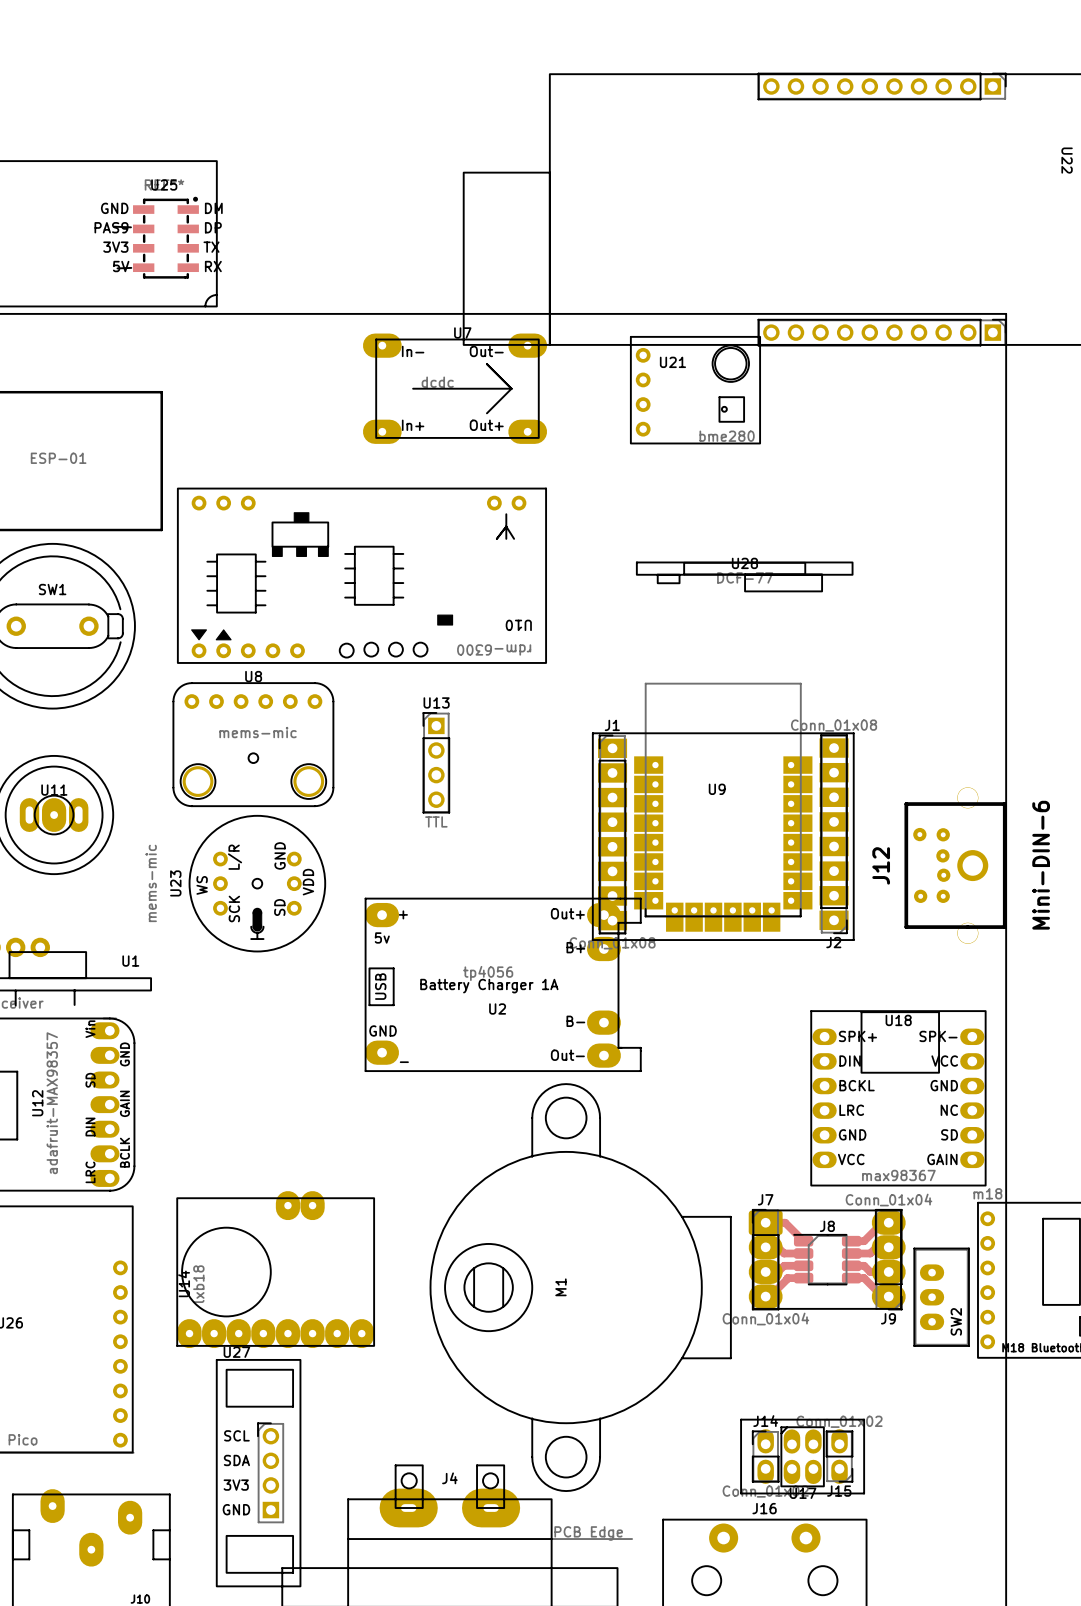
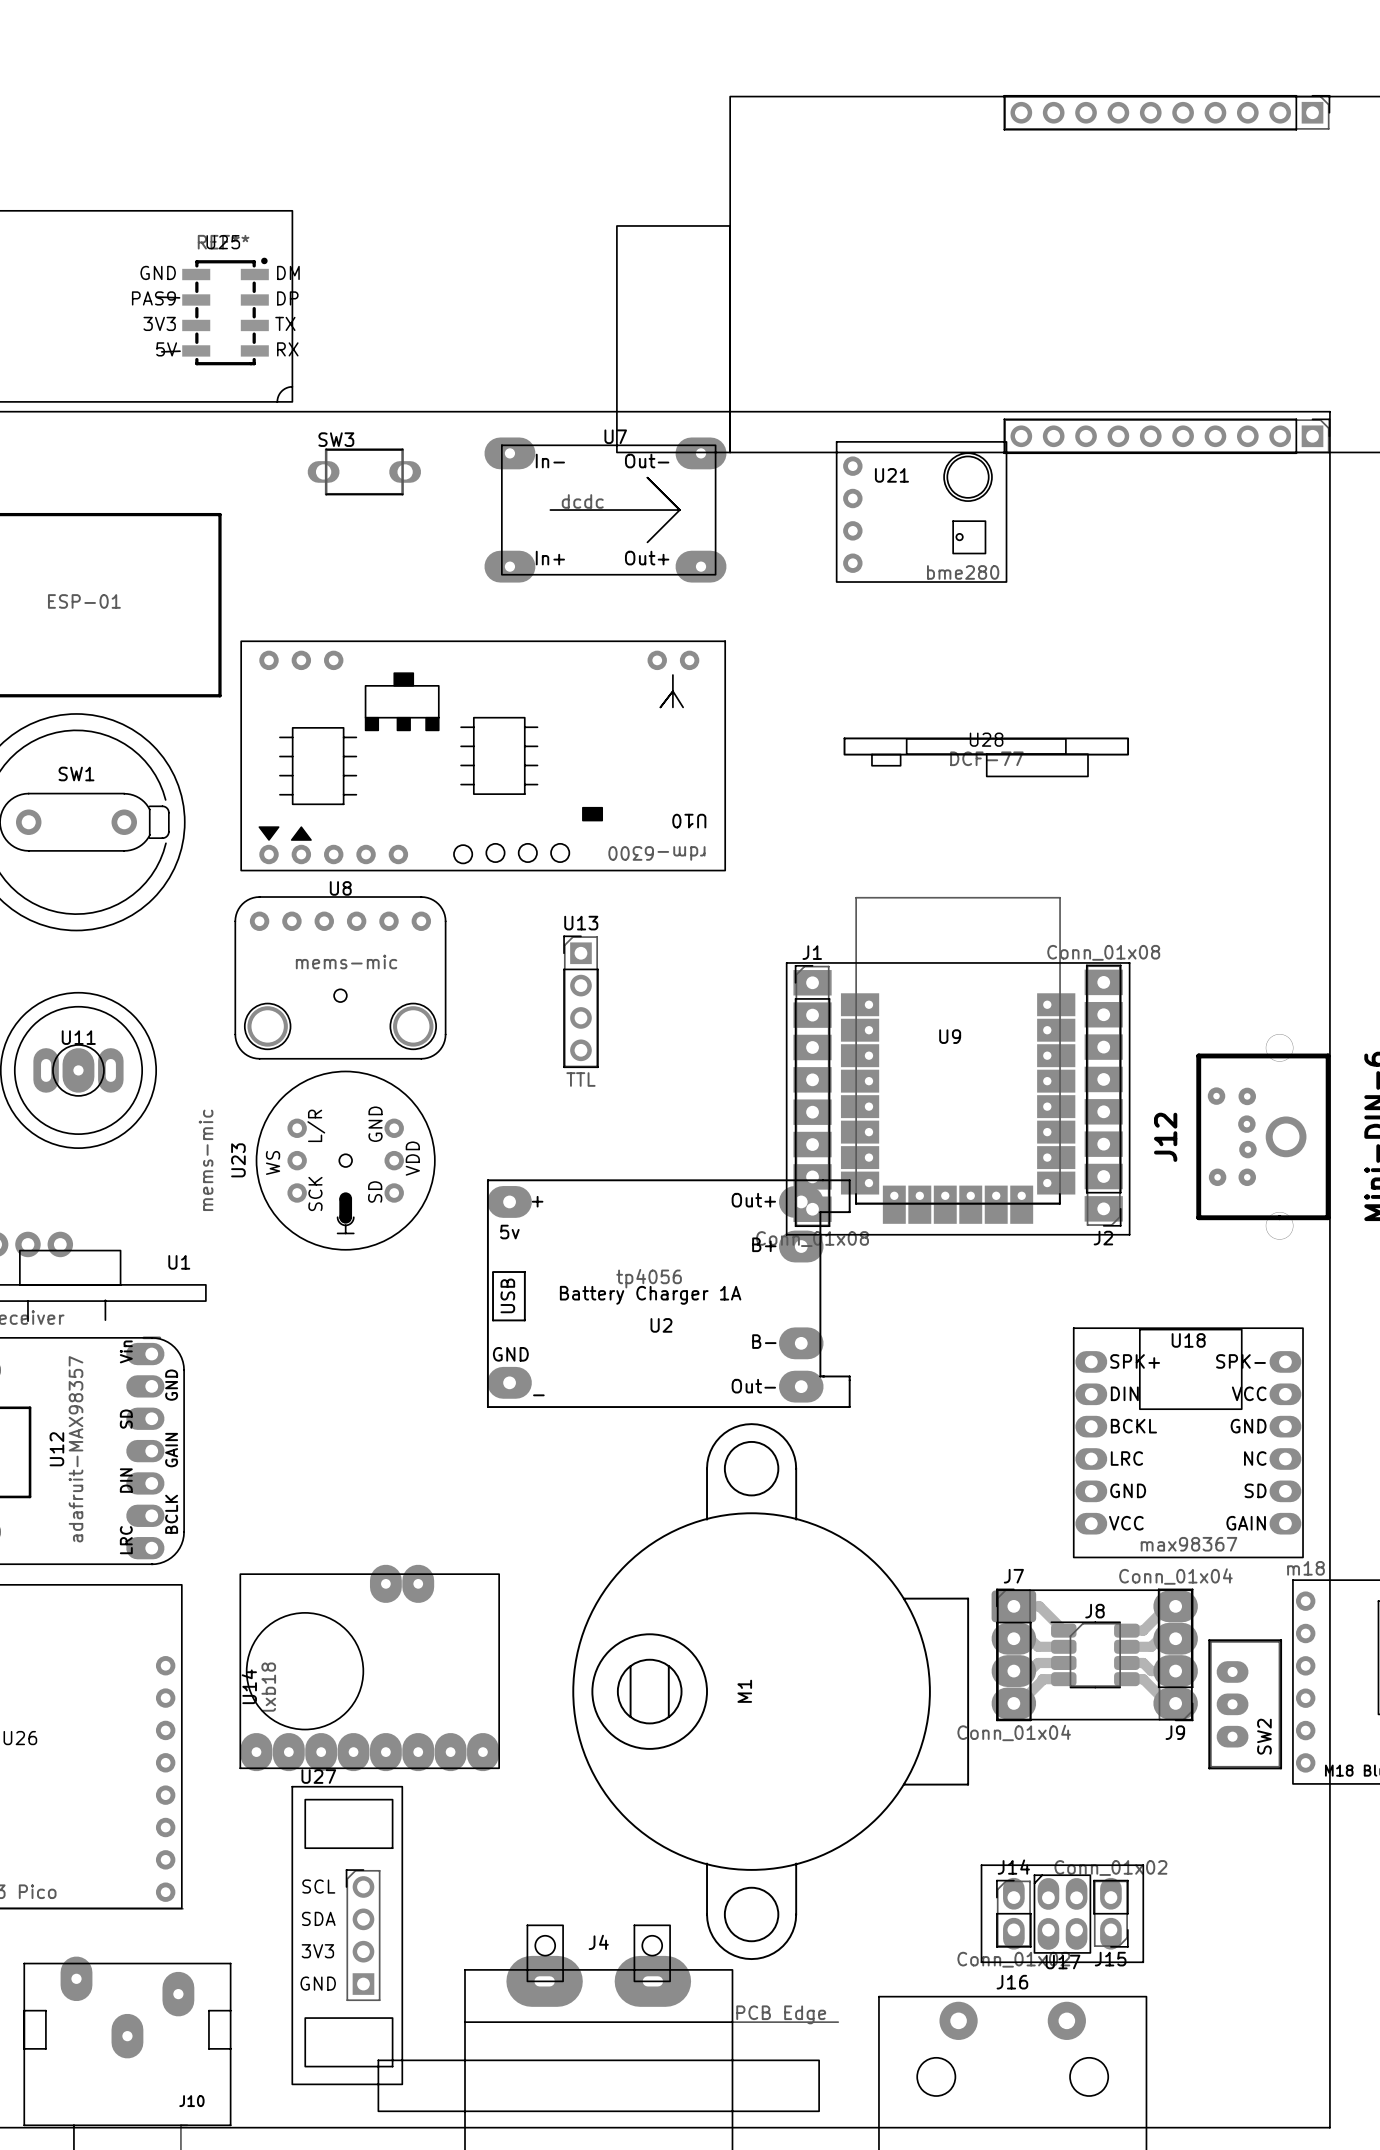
SW3: none -> (364, 471)

